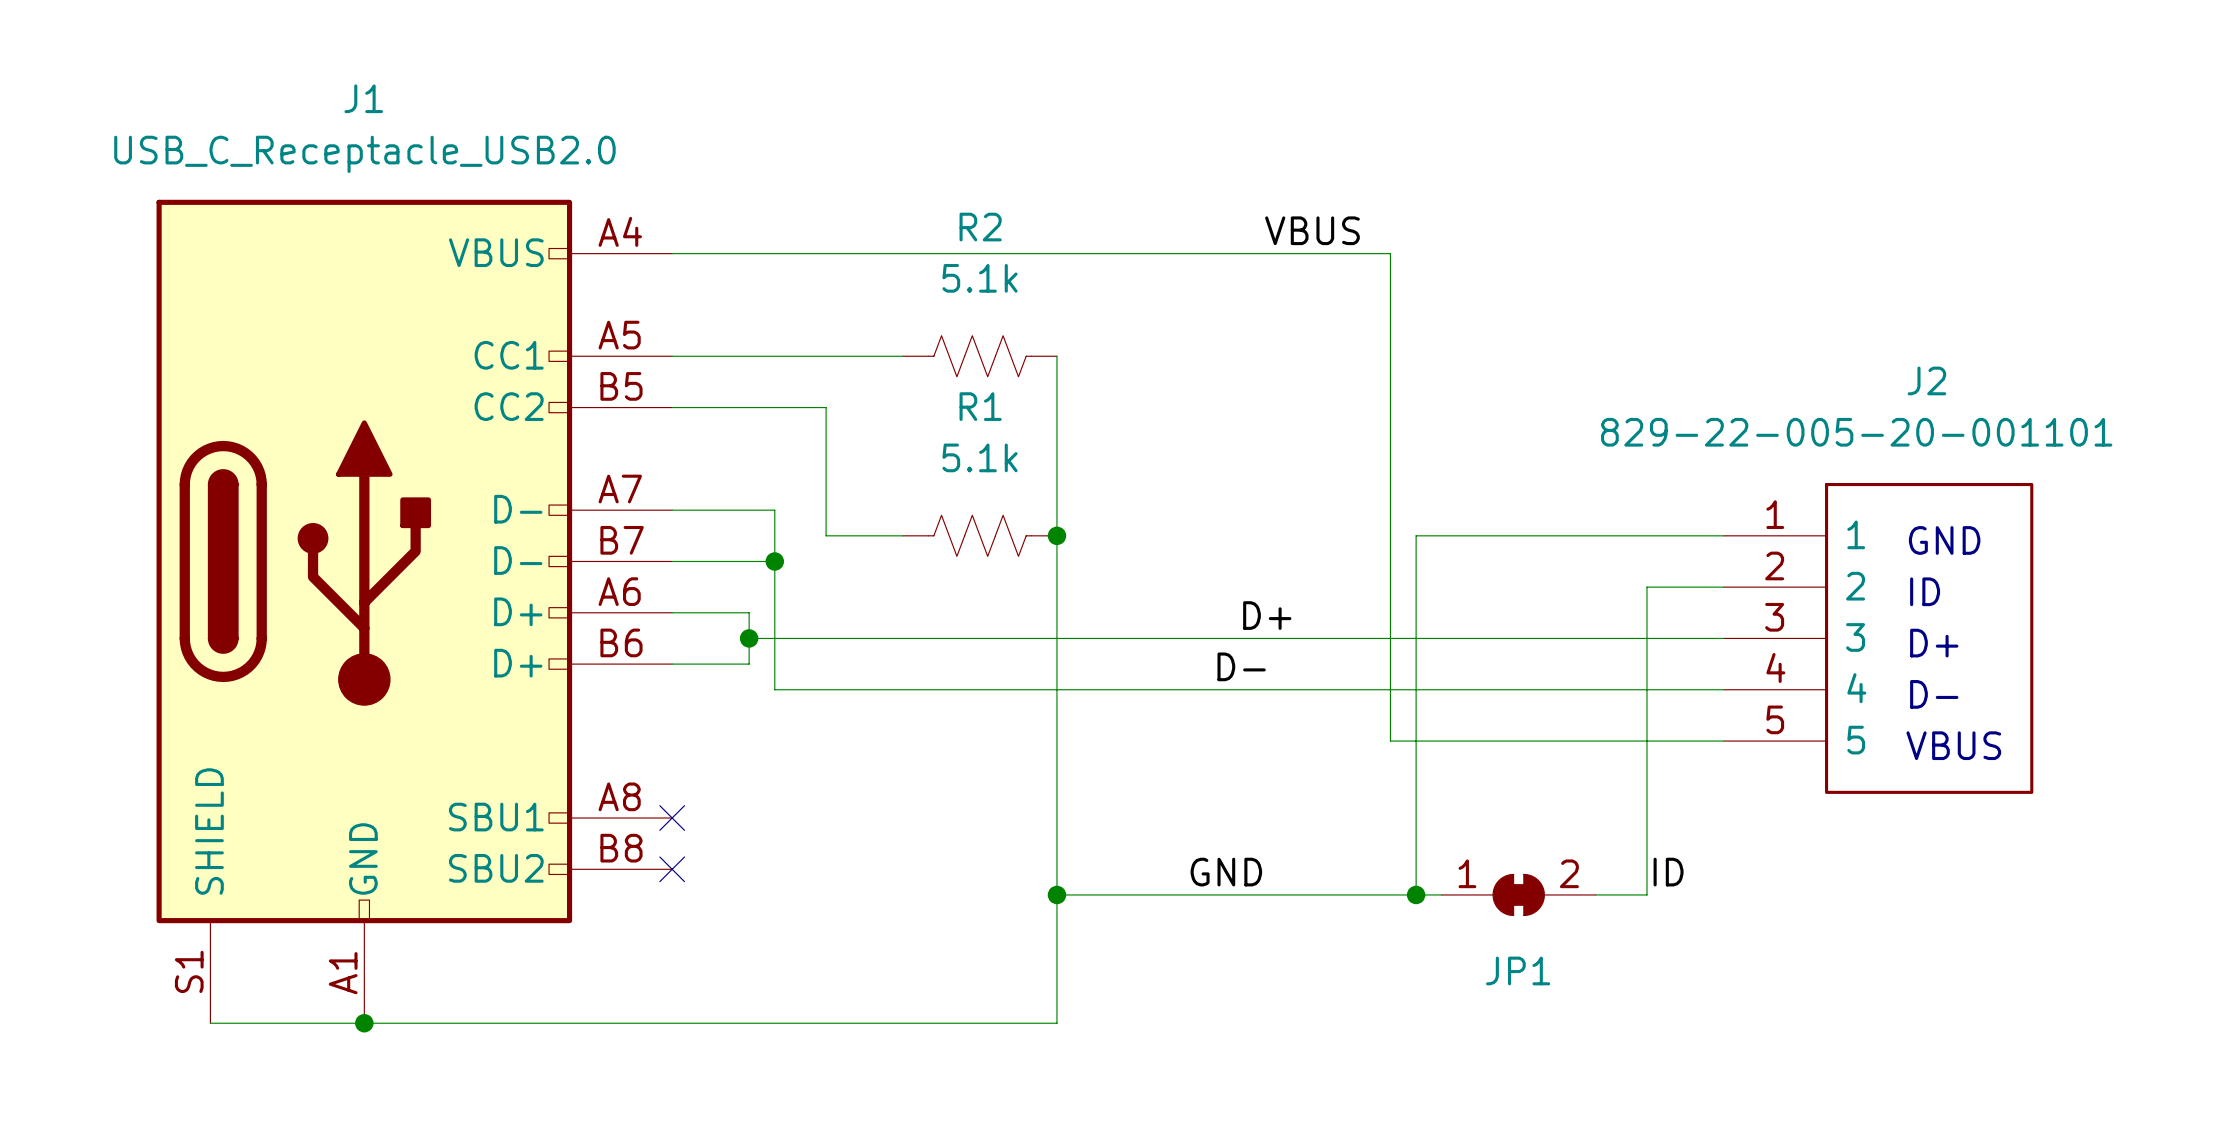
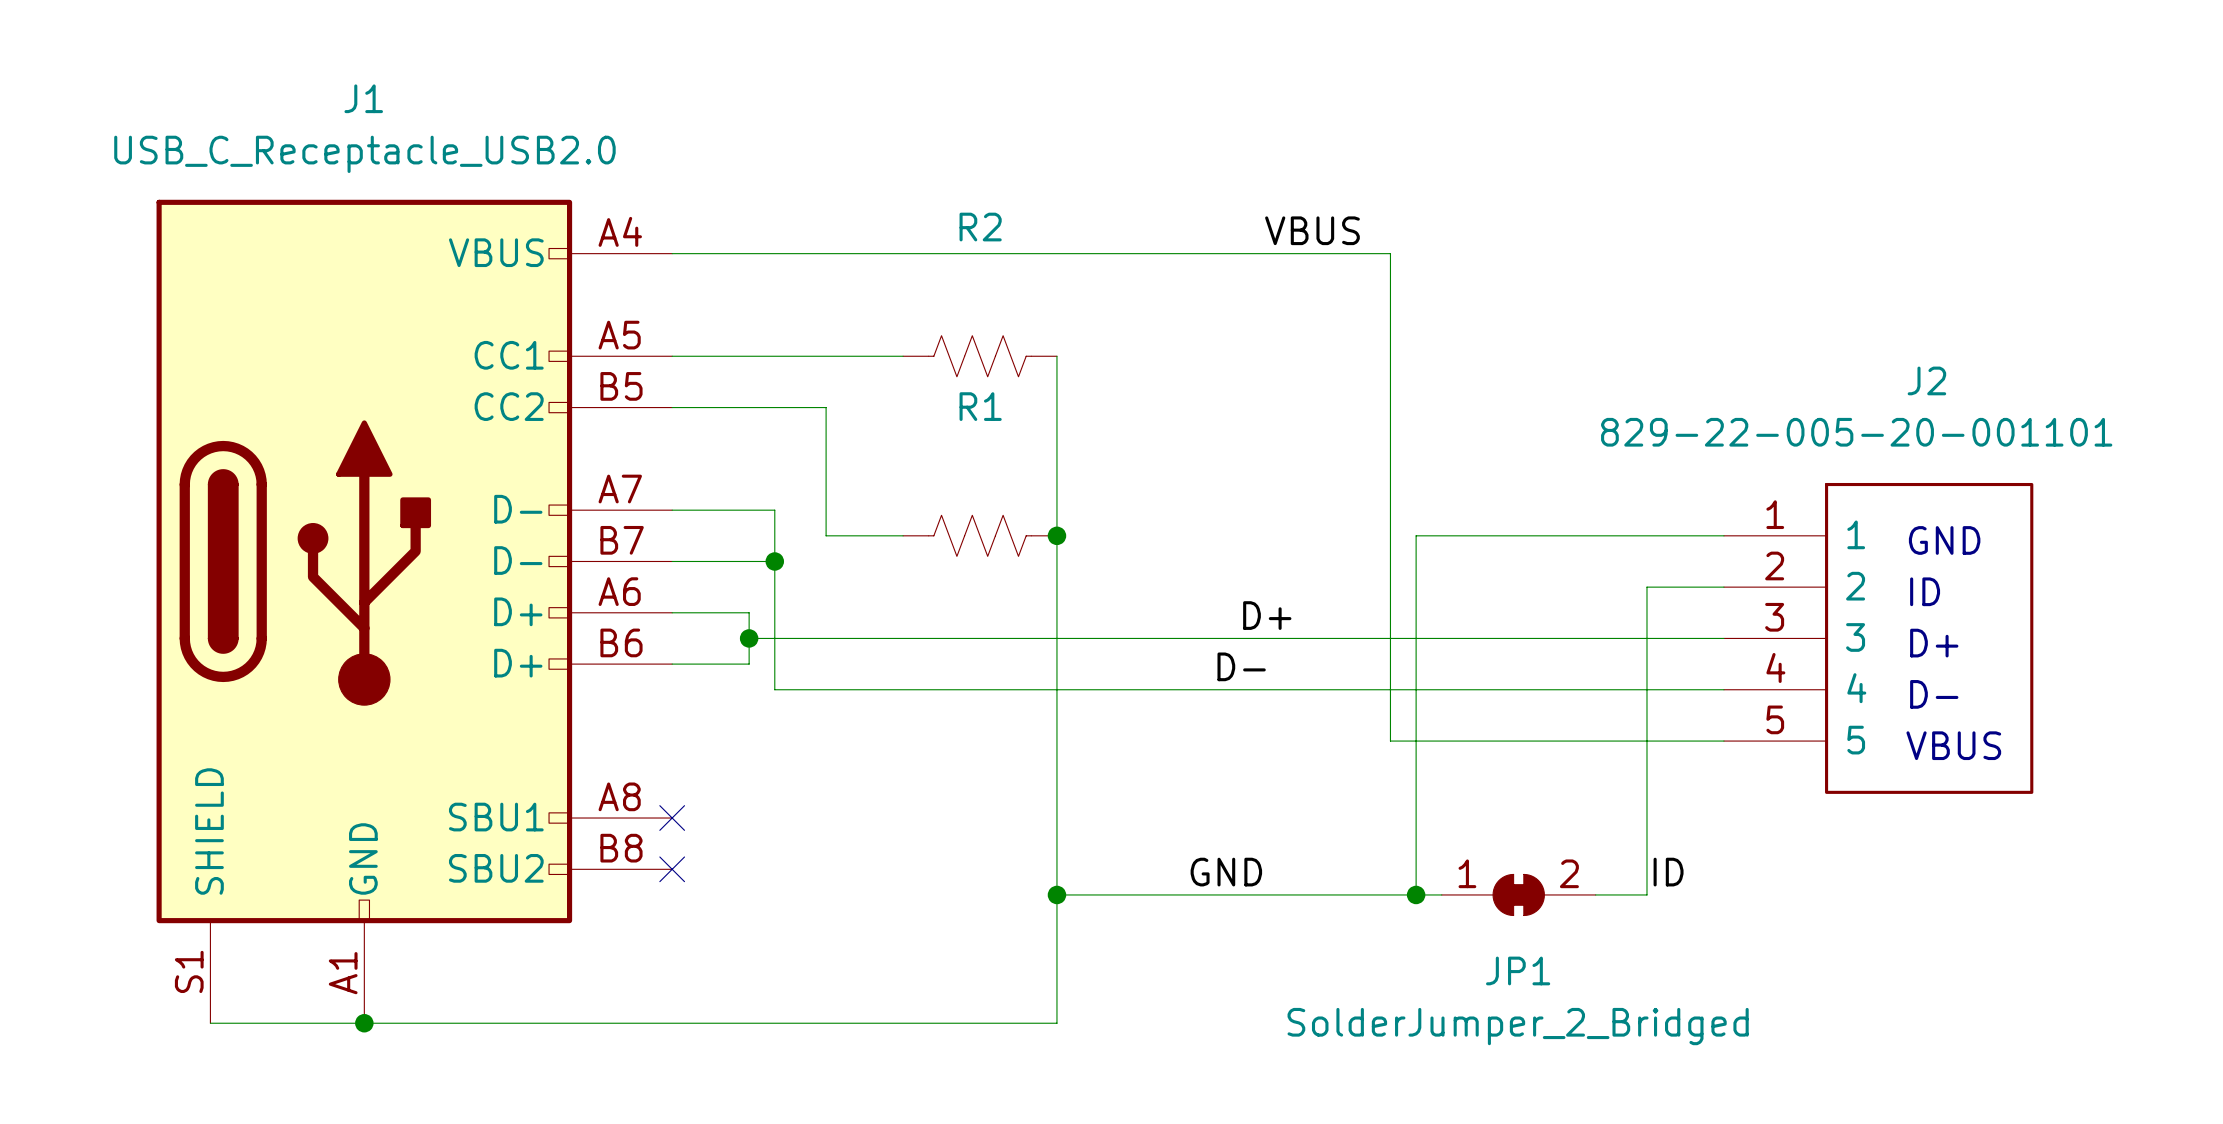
R2 value: 5.1k (980, 278) -> none
R1 value: 5.1k (980, 457) -> none
JP1 value: none -> SolderJumper_2_Bridged (1518, 1026)

